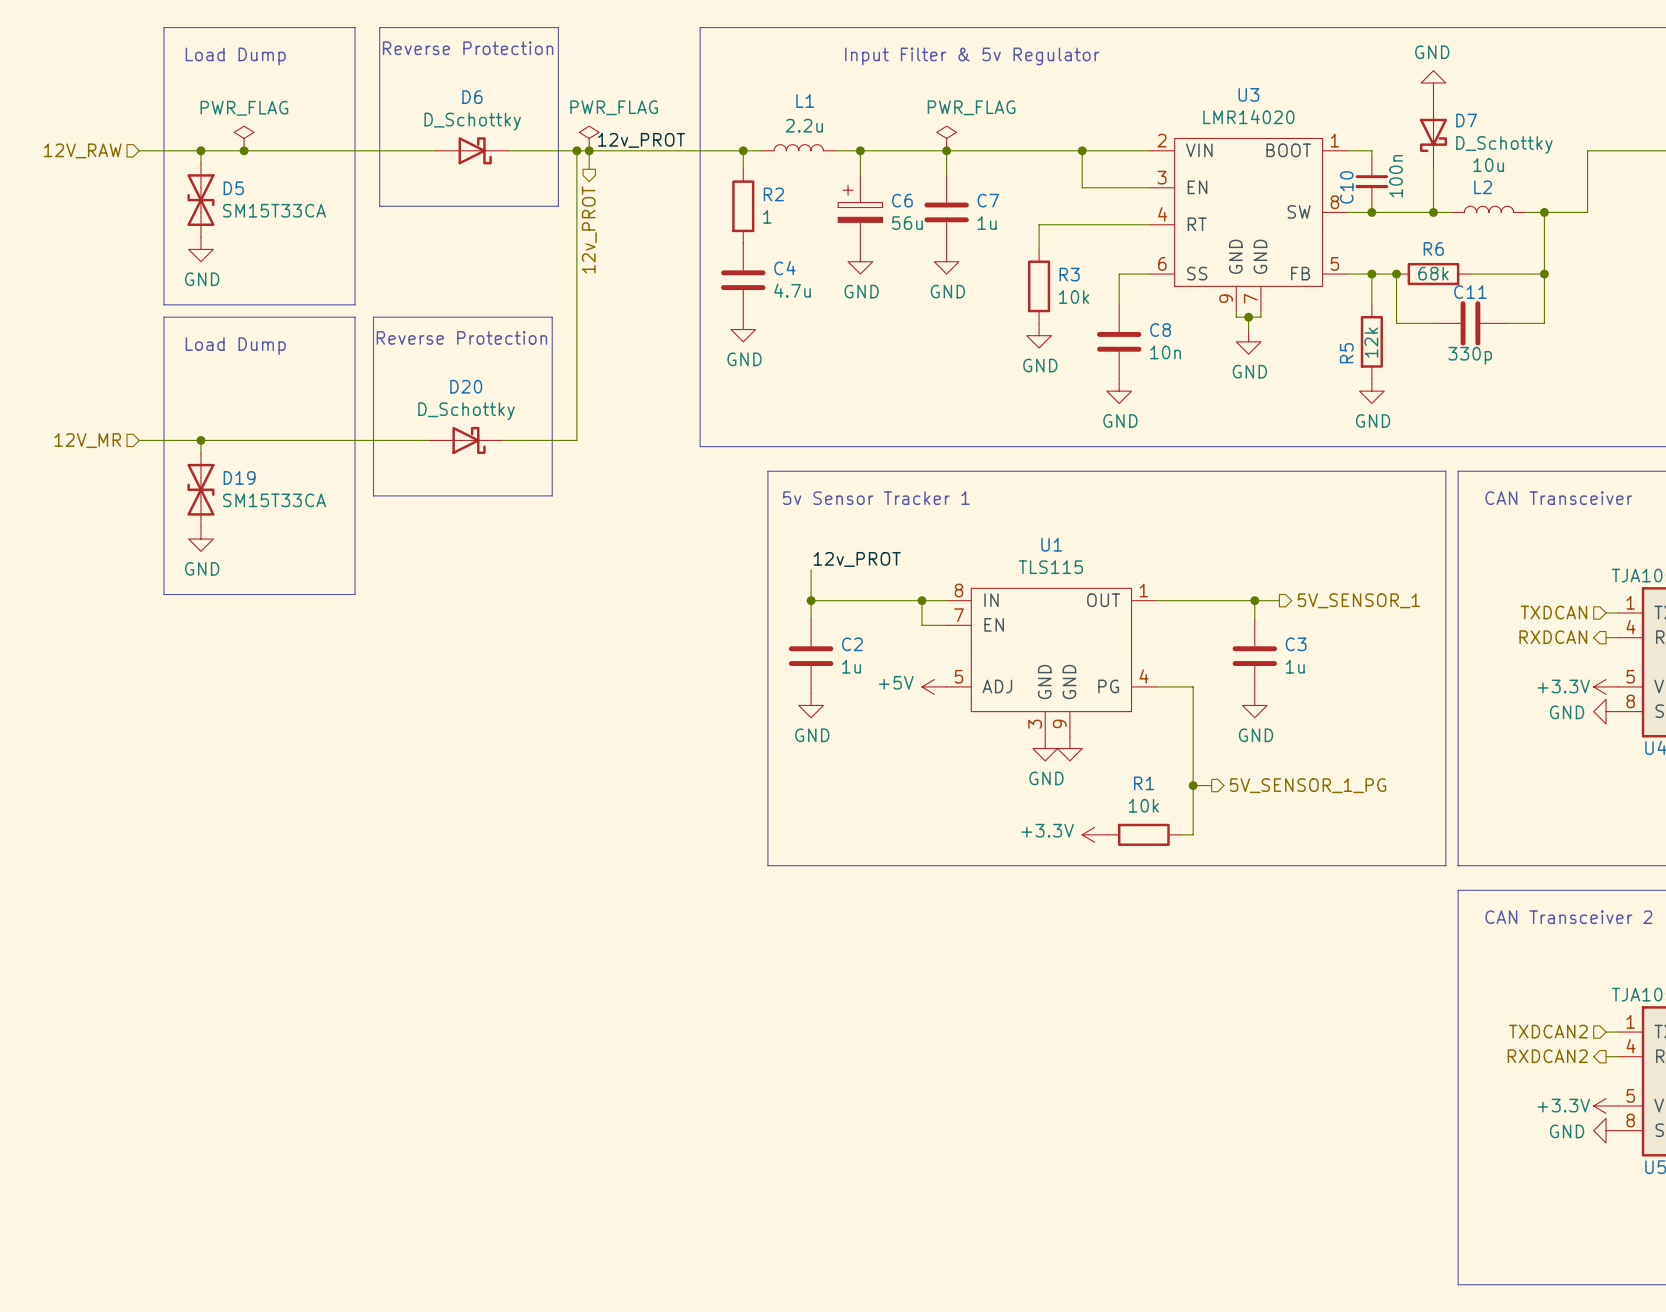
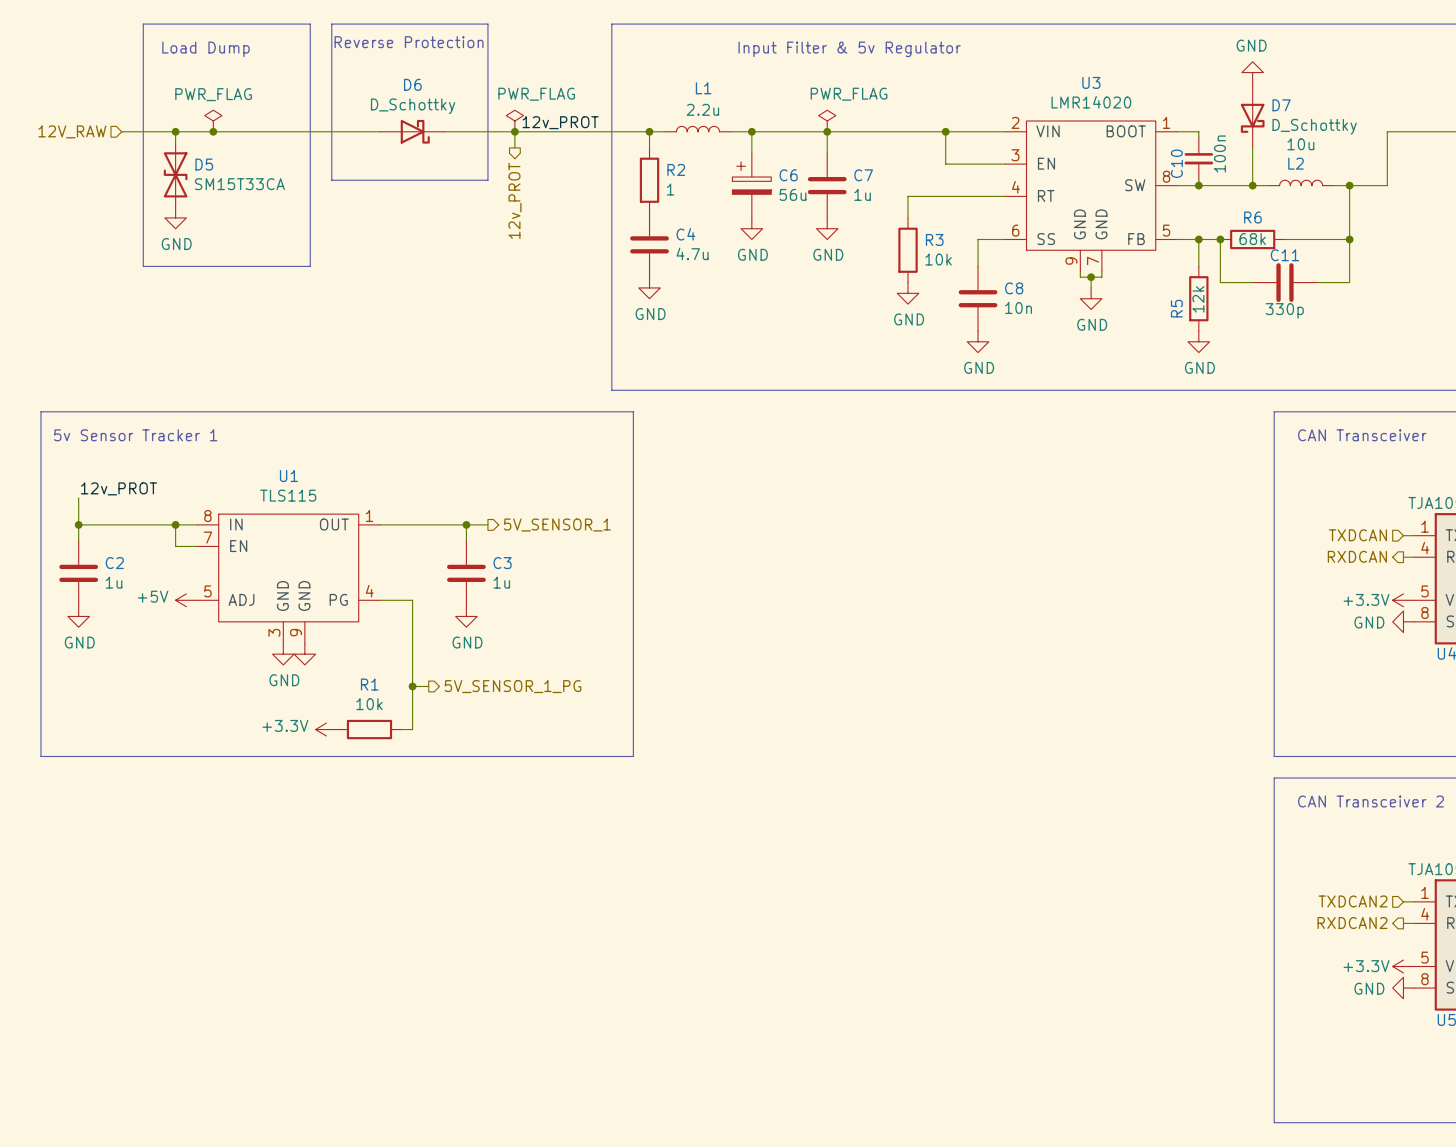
wire: (576, 150) (576, 440) (502, 440) -> none
junction: (576, 150) -> none
line: (163, 317) (355, 317) (355, 594) (163, 594) (163, 317) -> none
line: (373, 317) (552, 317) (552, 495) (373, 495) (373, 317) -> none
text: Reverse Protection (461, 337) -> none
text: Load Dump (235, 346) -> none
hierarchical label: 12V_MR (87, 440) -> none
wire: (139, 440) (428, 440) -> none
wire: (200, 440) (200, 452) -> none
junction: (200, 440) -> none
D20: D_Schottky (465, 440) -> none
line: none -> (40, 411) (40, 756) (633, 756) (633, 411) (40, 411)
line: (767, 471) (767, 865) (1445, 865) (1445, 471) (767, 471) -> none
D19: SM15T33CA (200, 489) -> none
text: none -> 5v Sensor Tracker 1 (135, 435)
text: 5v Sensor Tracker 1 (876, 498) -> none
power symbol: GND (200, 539) -> none
label: none -> 12v_PROT (119, 488)
label: 12v_PROT (857, 559) -> none
wire: none -> (78, 497) (78, 541)
wire: (811, 569) (811, 619) -> none
wire: none -> (78, 524) (197, 524)
junction: none -> (78, 524)
wire: none -> (175, 524) (175, 546) (197, 546)
junction: none -> (175, 524)
wire: none -> (380, 524) (487, 524)
wire: none -> (466, 524) (466, 541)
junction: none -> (466, 524)
hierarchical label: none -> 5V_SENSOR_1 (557, 525)
wire: (811, 600) (946, 600) -> none
junction: (811, 600) -> none
wire: (921, 600) (921, 625) (946, 625) -> none
junction: (921, 600) -> none
wire: (1156, 600) (1279, 600) -> none
wire: (1254, 600) (1254, 619) -> none
junction: (1254, 600) -> none
hierarchical label: 5V_SENSOR_1 (1358, 600) -> none
C2 position: (811, 656) -> (78, 573)
C3 position: (1254, 656) -> (466, 573)
U1 position: (1051, 662) -> (288, 578)
power symbol: none -> +5V (186, 600)
wire: none -> (380, 600) (412, 600) (412, 729) (401, 729)
power symbol: +5V (934, 686) -> none
wire: (1156, 686) (1193, 686) (1193, 834) (1180, 834) -> none
power symbol: none -> GND (78, 616)
power symbol: none -> GND (466, 616)
power symbol: GND (811, 705) -> none
power symbol: GND (1254, 705) -> none
power symbol: none -> GND (283, 654)
power symbol: none -> (304, 654)
power symbol: GND (1045, 748) -> none
power symbol: (1069, 748) -> none
wire: none -> (412, 686) (428, 686)
junction: none -> (412, 686)
hierarchical label: none -> 5V_SENSOR_1_PG (513, 686)
wire: (1193, 785) (1211, 785) -> none
junction: (1193, 785) -> none
hierarchical label: 5V_SENSOR_1_PG (1308, 785) -> none
power symbol: none -> +3.3V (326, 729)
power symbol: +3.3V (1094, 834) -> none
R1 position: (1143, 834) -> (369, 729)

